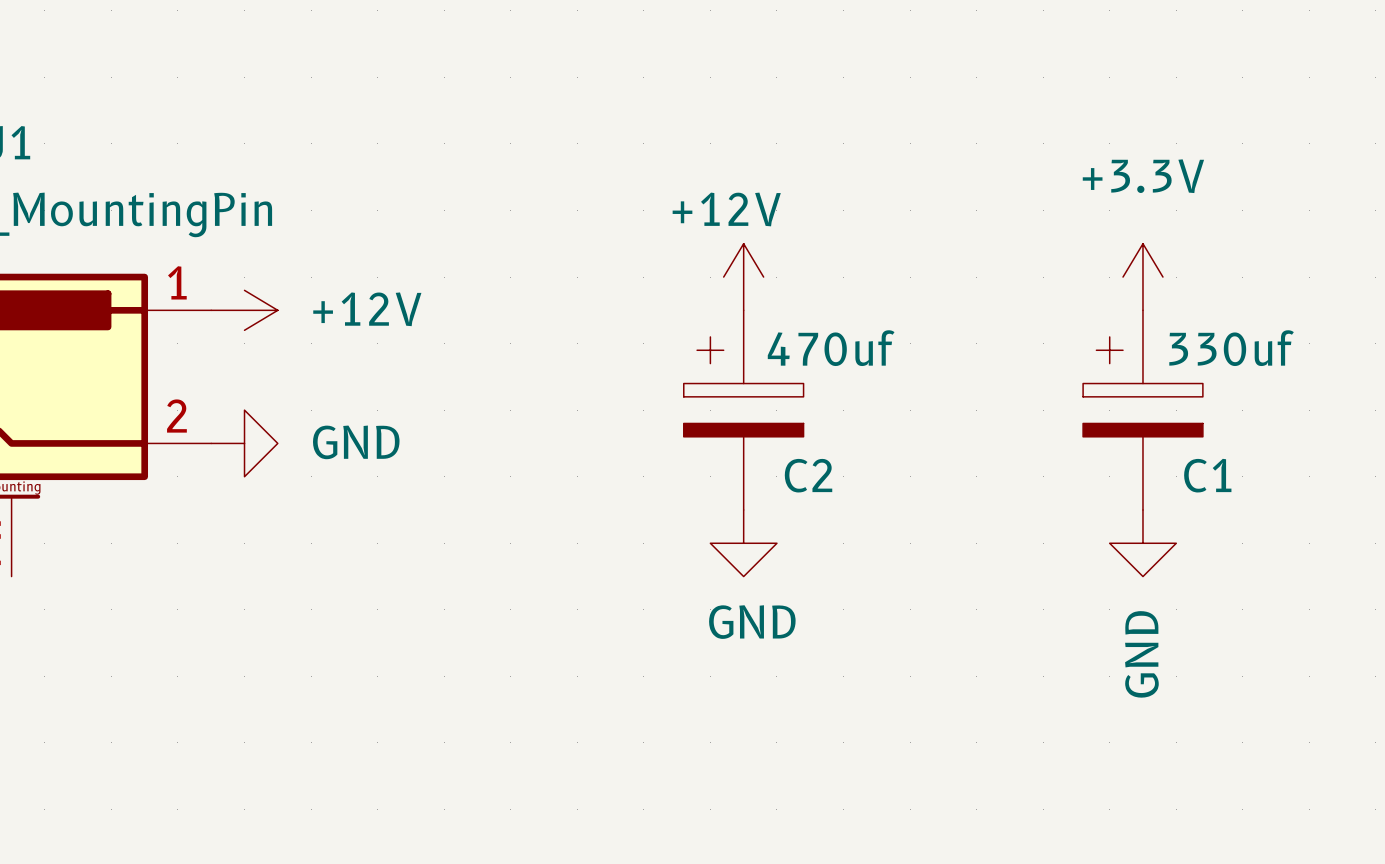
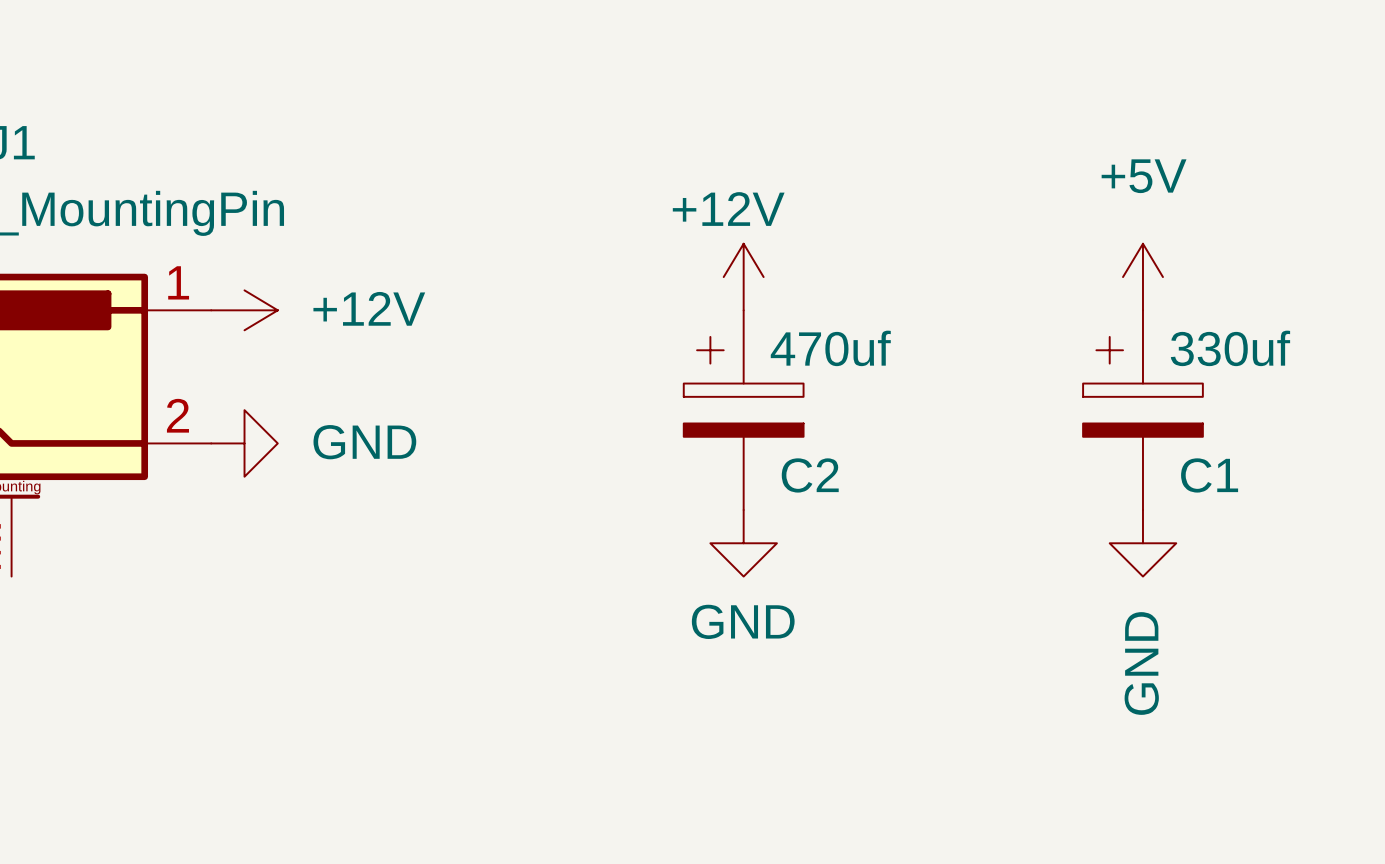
power symbol: +3.3V (1142, 277) -> +5V (1142, 277)

